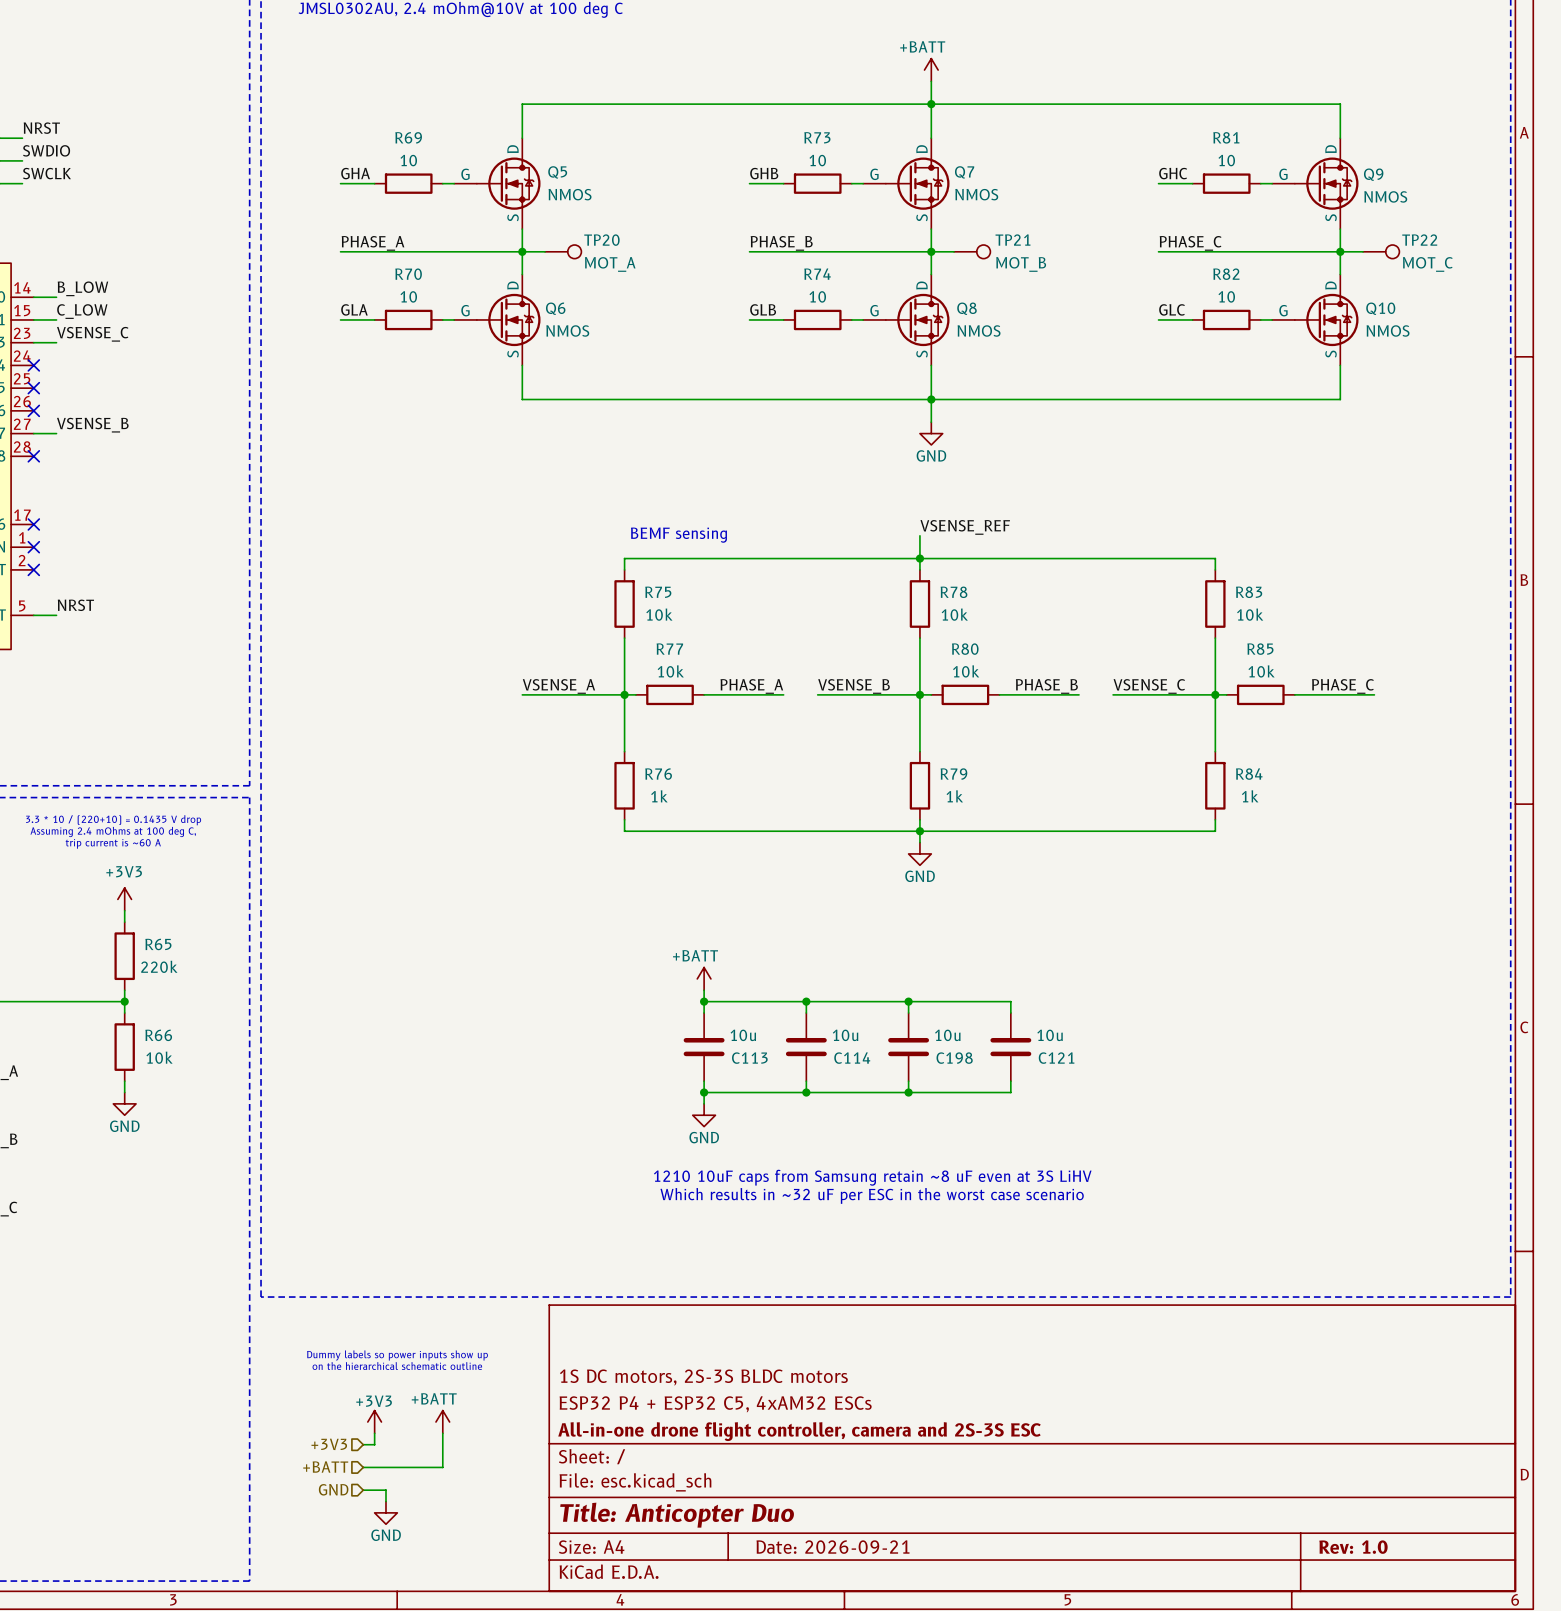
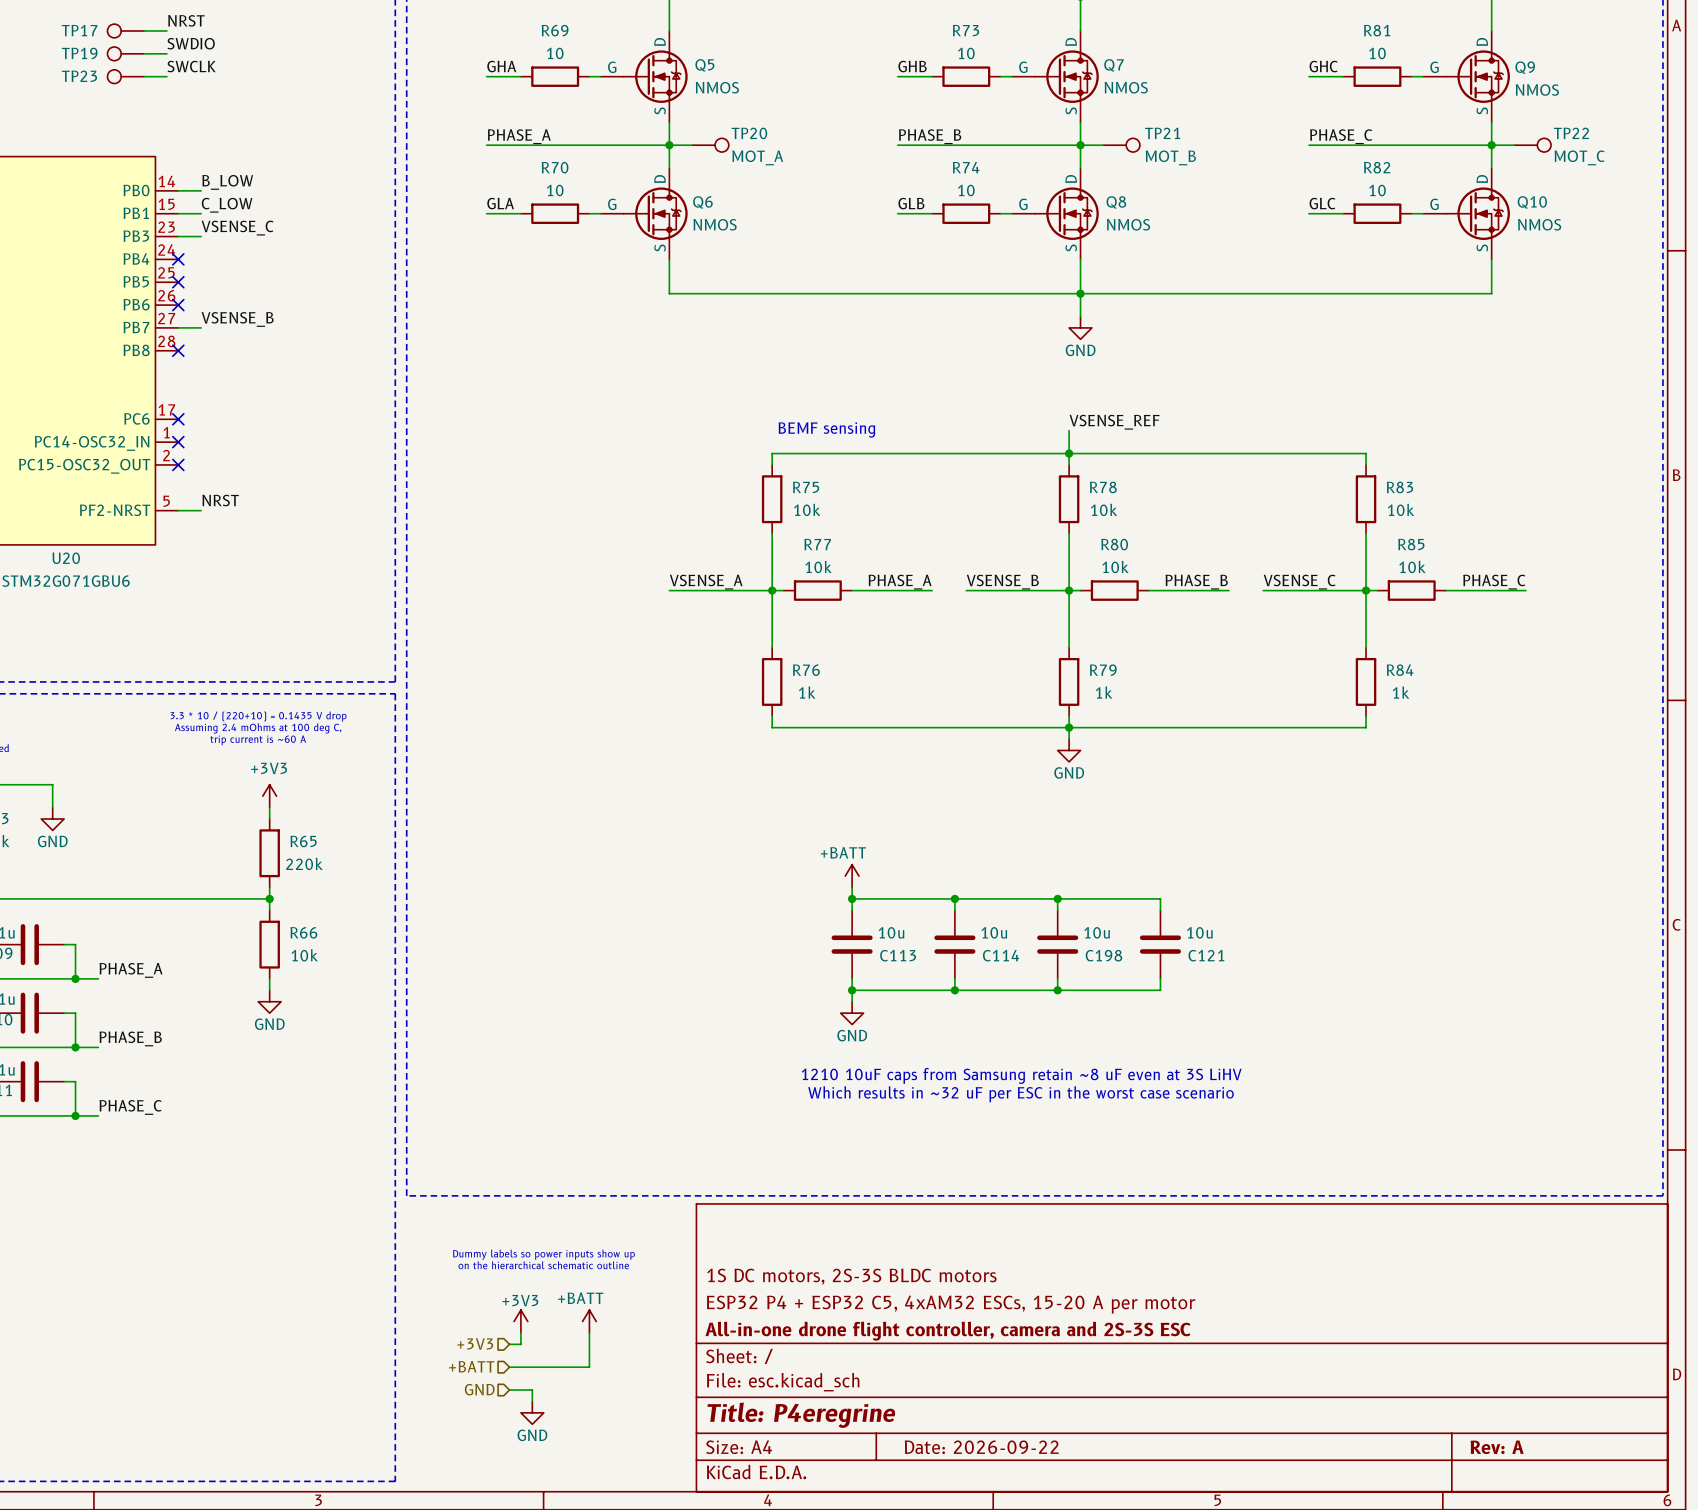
title block: ESP32 P4 + ESP32 C5, 4xAM32 ESCs (715, 1404) -> ESP32 P4 + ESP32 C5, 4xAM32 ESCs, 15-20 A per motor (951, 1304)
title block: Title: Anticopter Duo (677, 1515) -> Title: P4eregrine (801, 1415)
title block: Date: 2026-09-21 (832, 1547) -> Date: 2026-09-22 (981, 1447)
title block: Rev: 1.0 (1353, 1547) -> Rev: A (1497, 1447)

